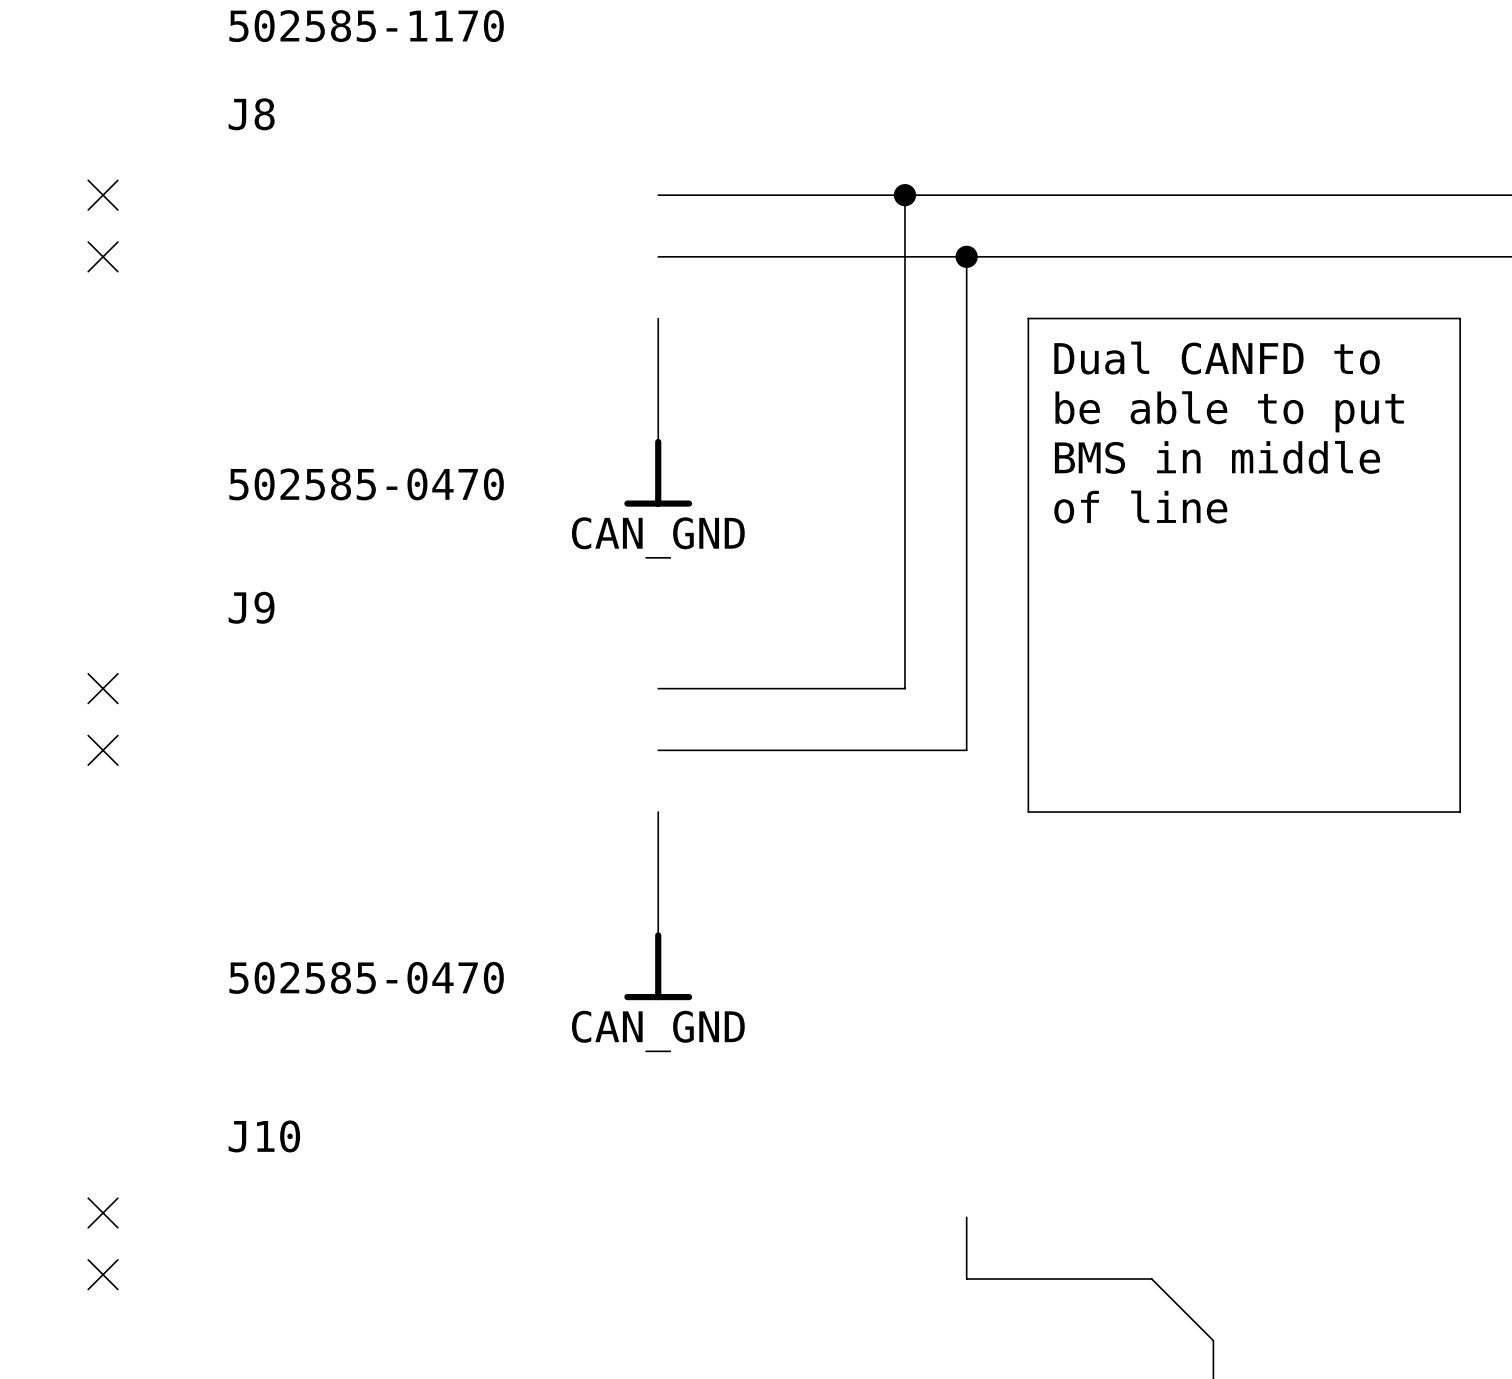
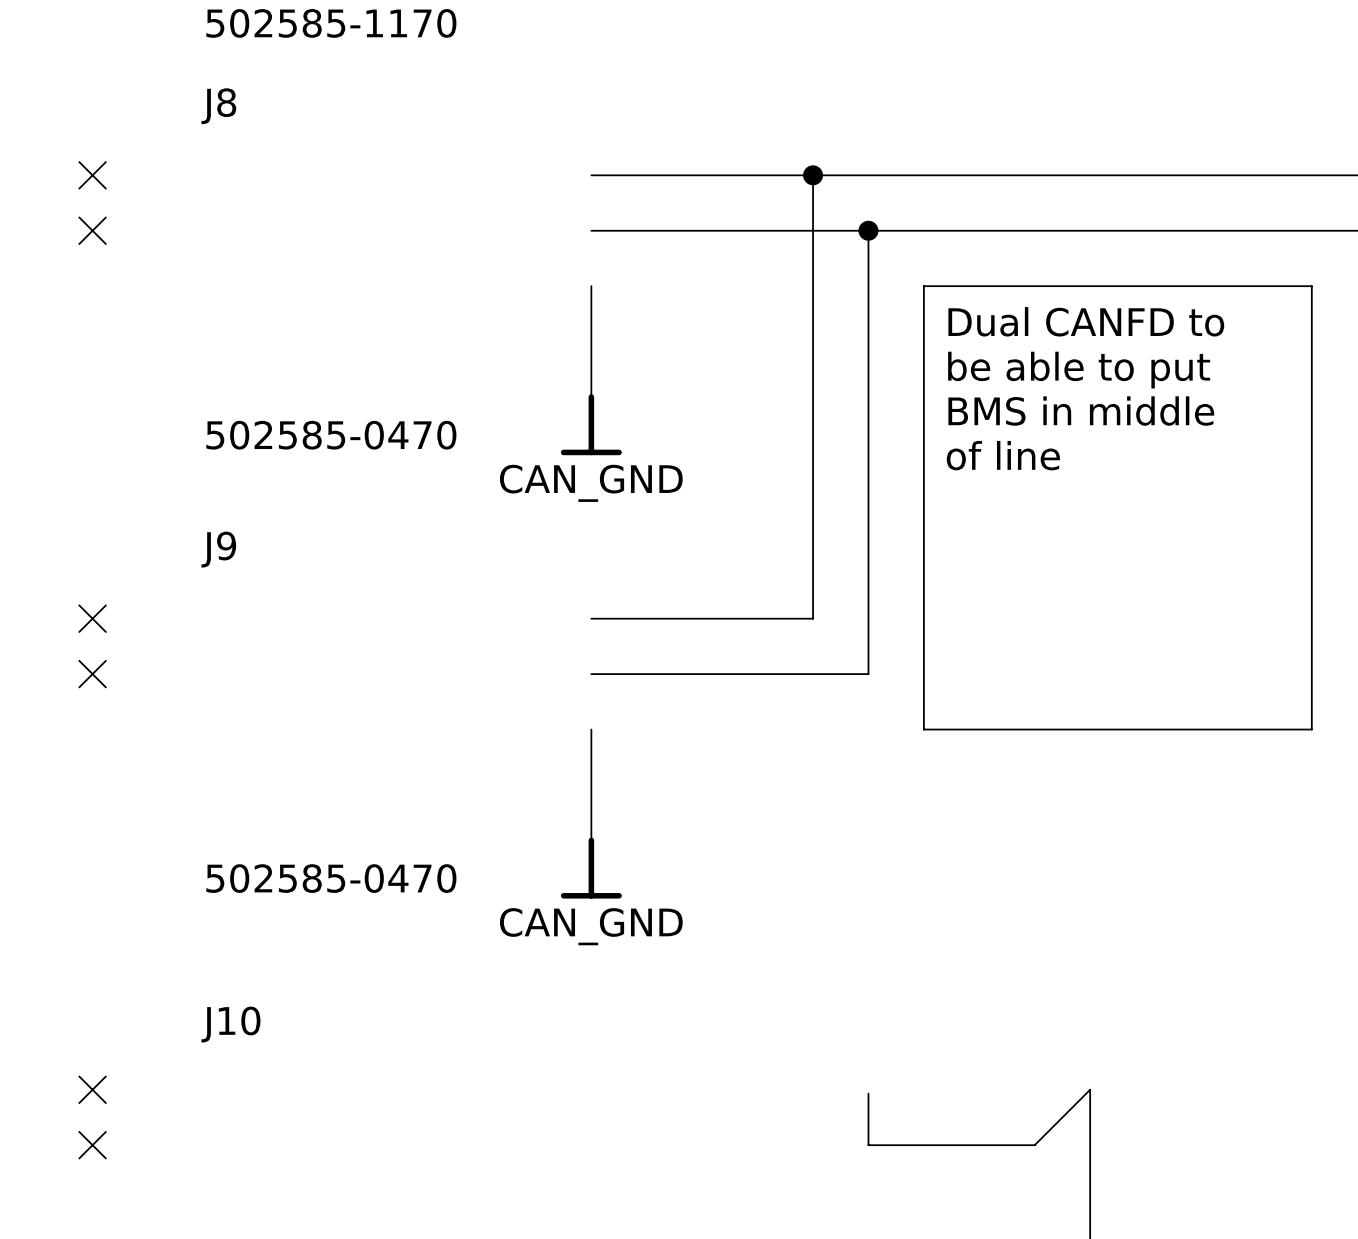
bus: none -> (1090, 1089) (1090, 1204)
wire: (966, 1274) (966, 1278) (1151, 1278) (1213, 1340) -> (868, 1145) (1034, 1145) (1090, 1089)

